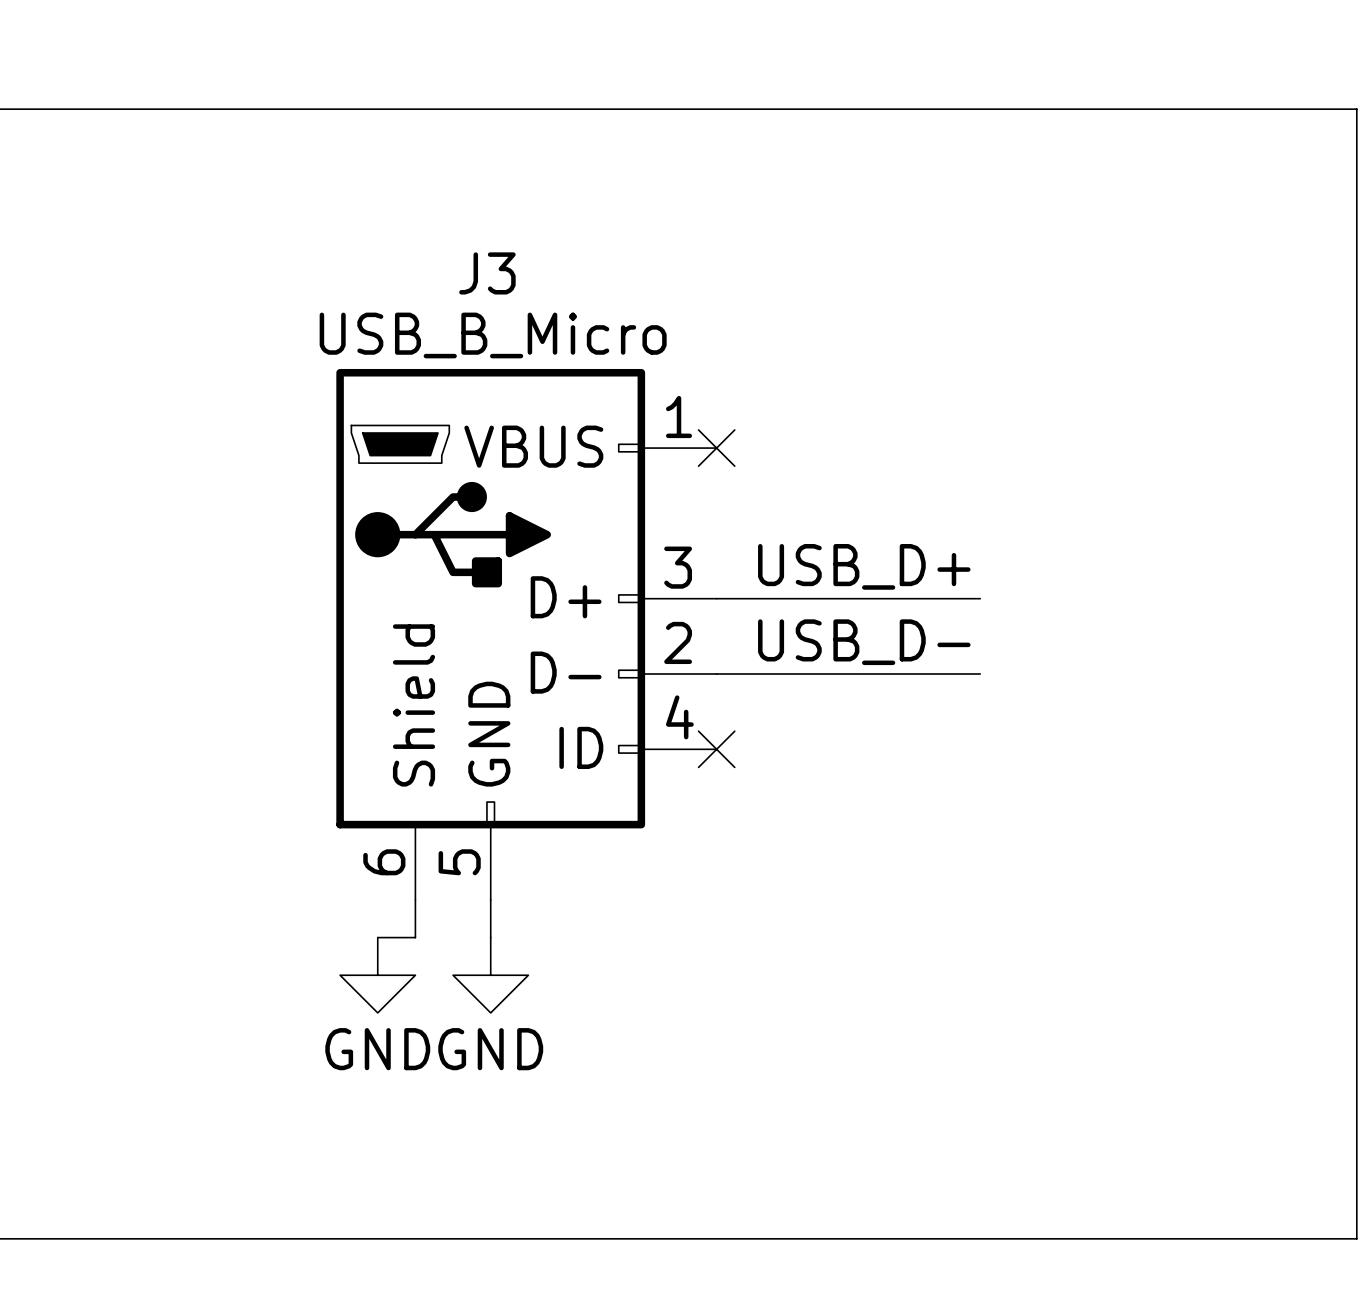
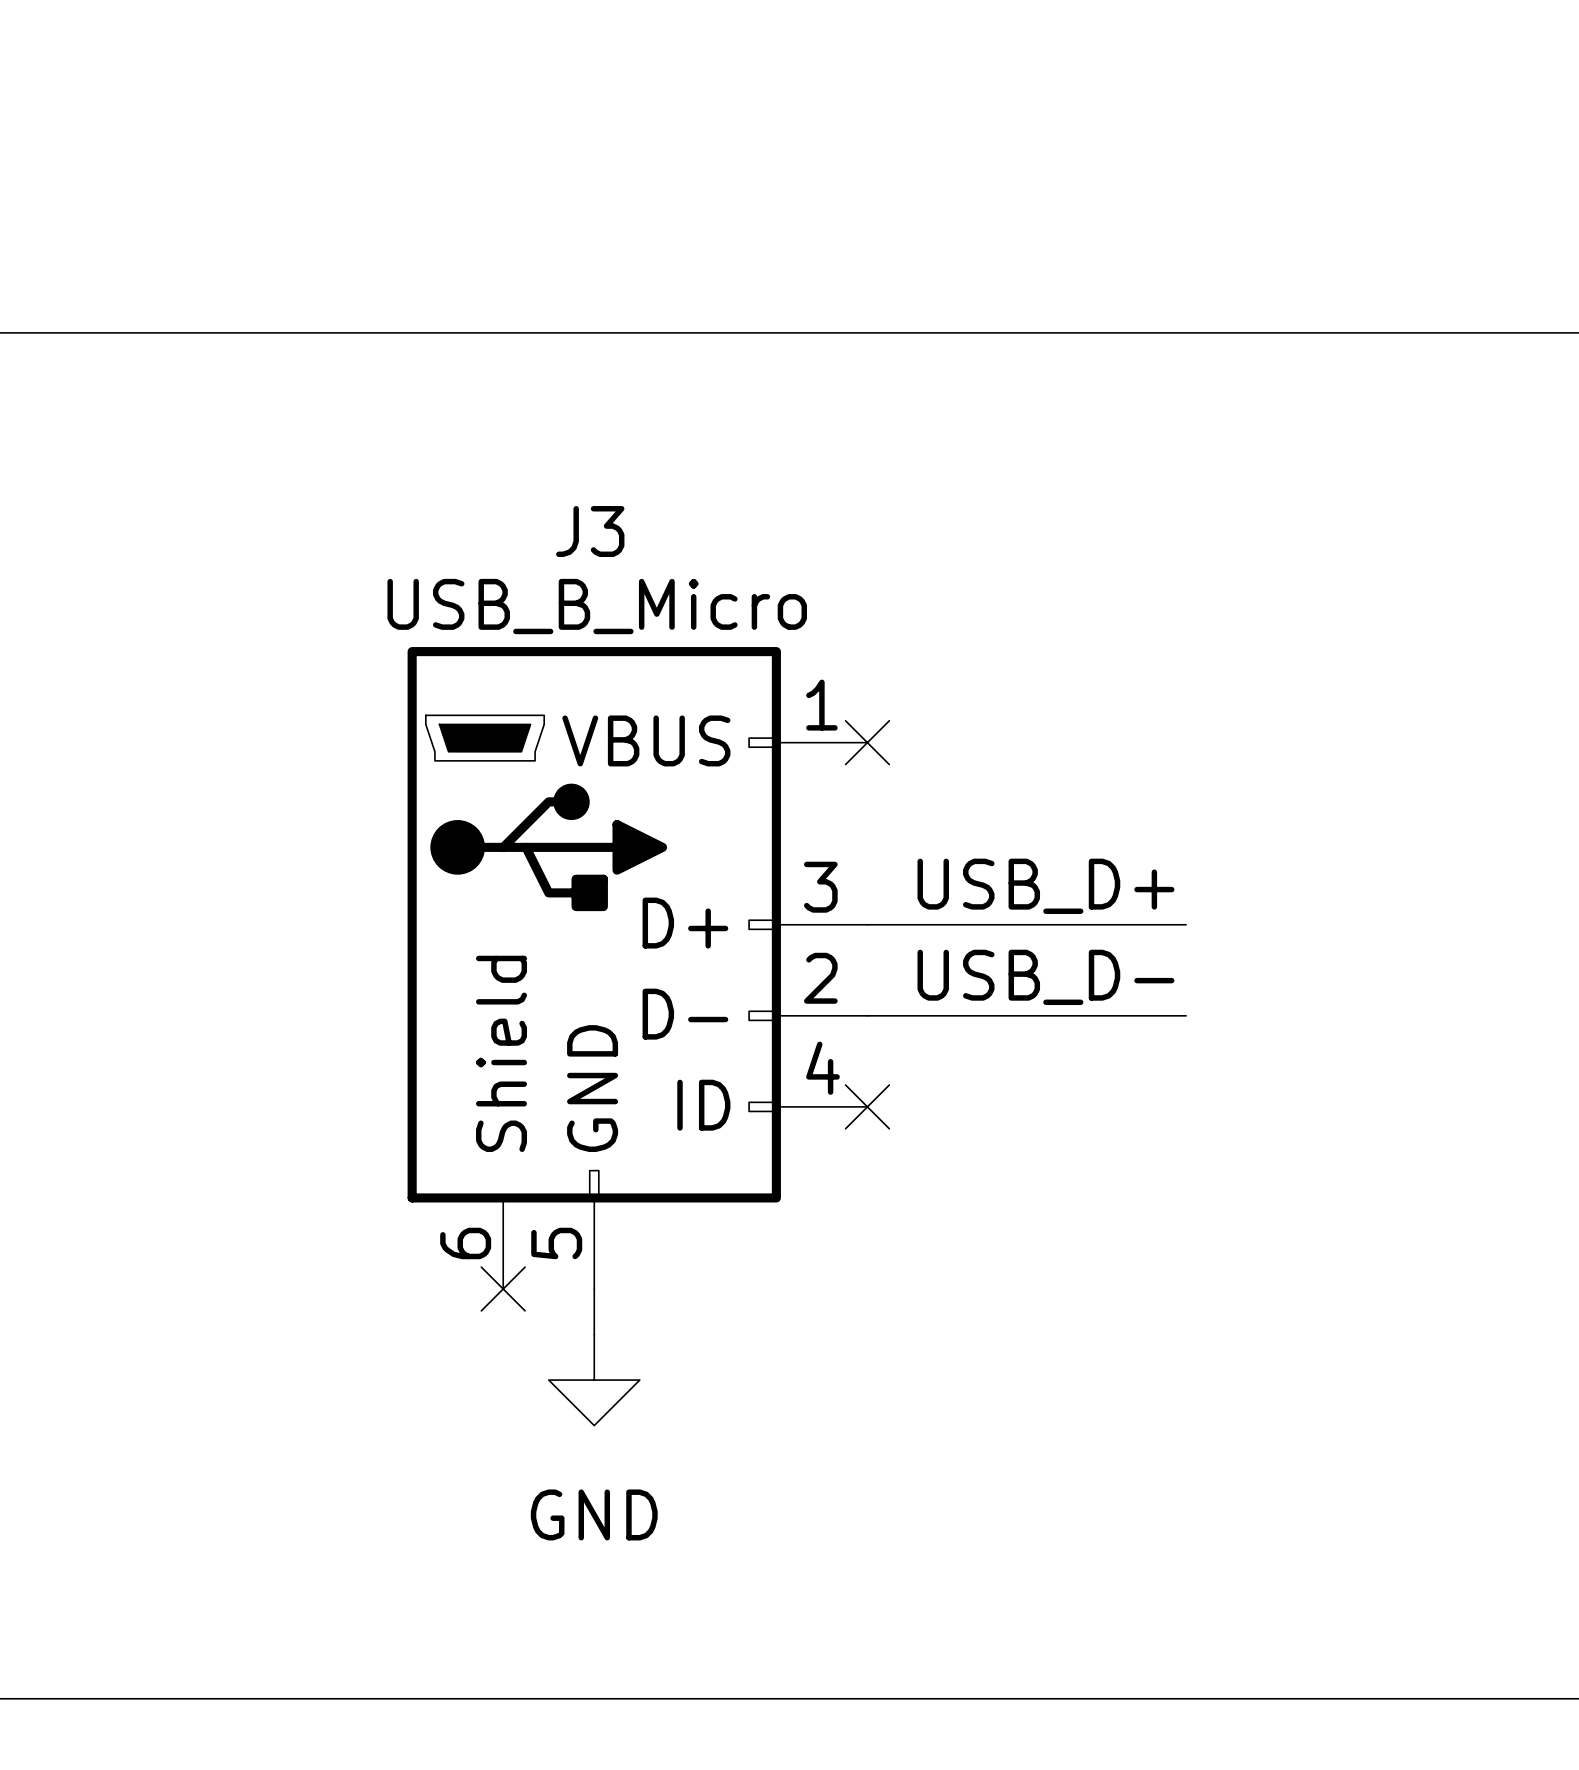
wire: (415, 899) (415, 937) (377, 937) -> none
no-connect mark: none -> (503, 1289)
power symbol: GND (377, 975) -> none
power symbol text position: GND (490, 1049) -> GND (594, 1514)

